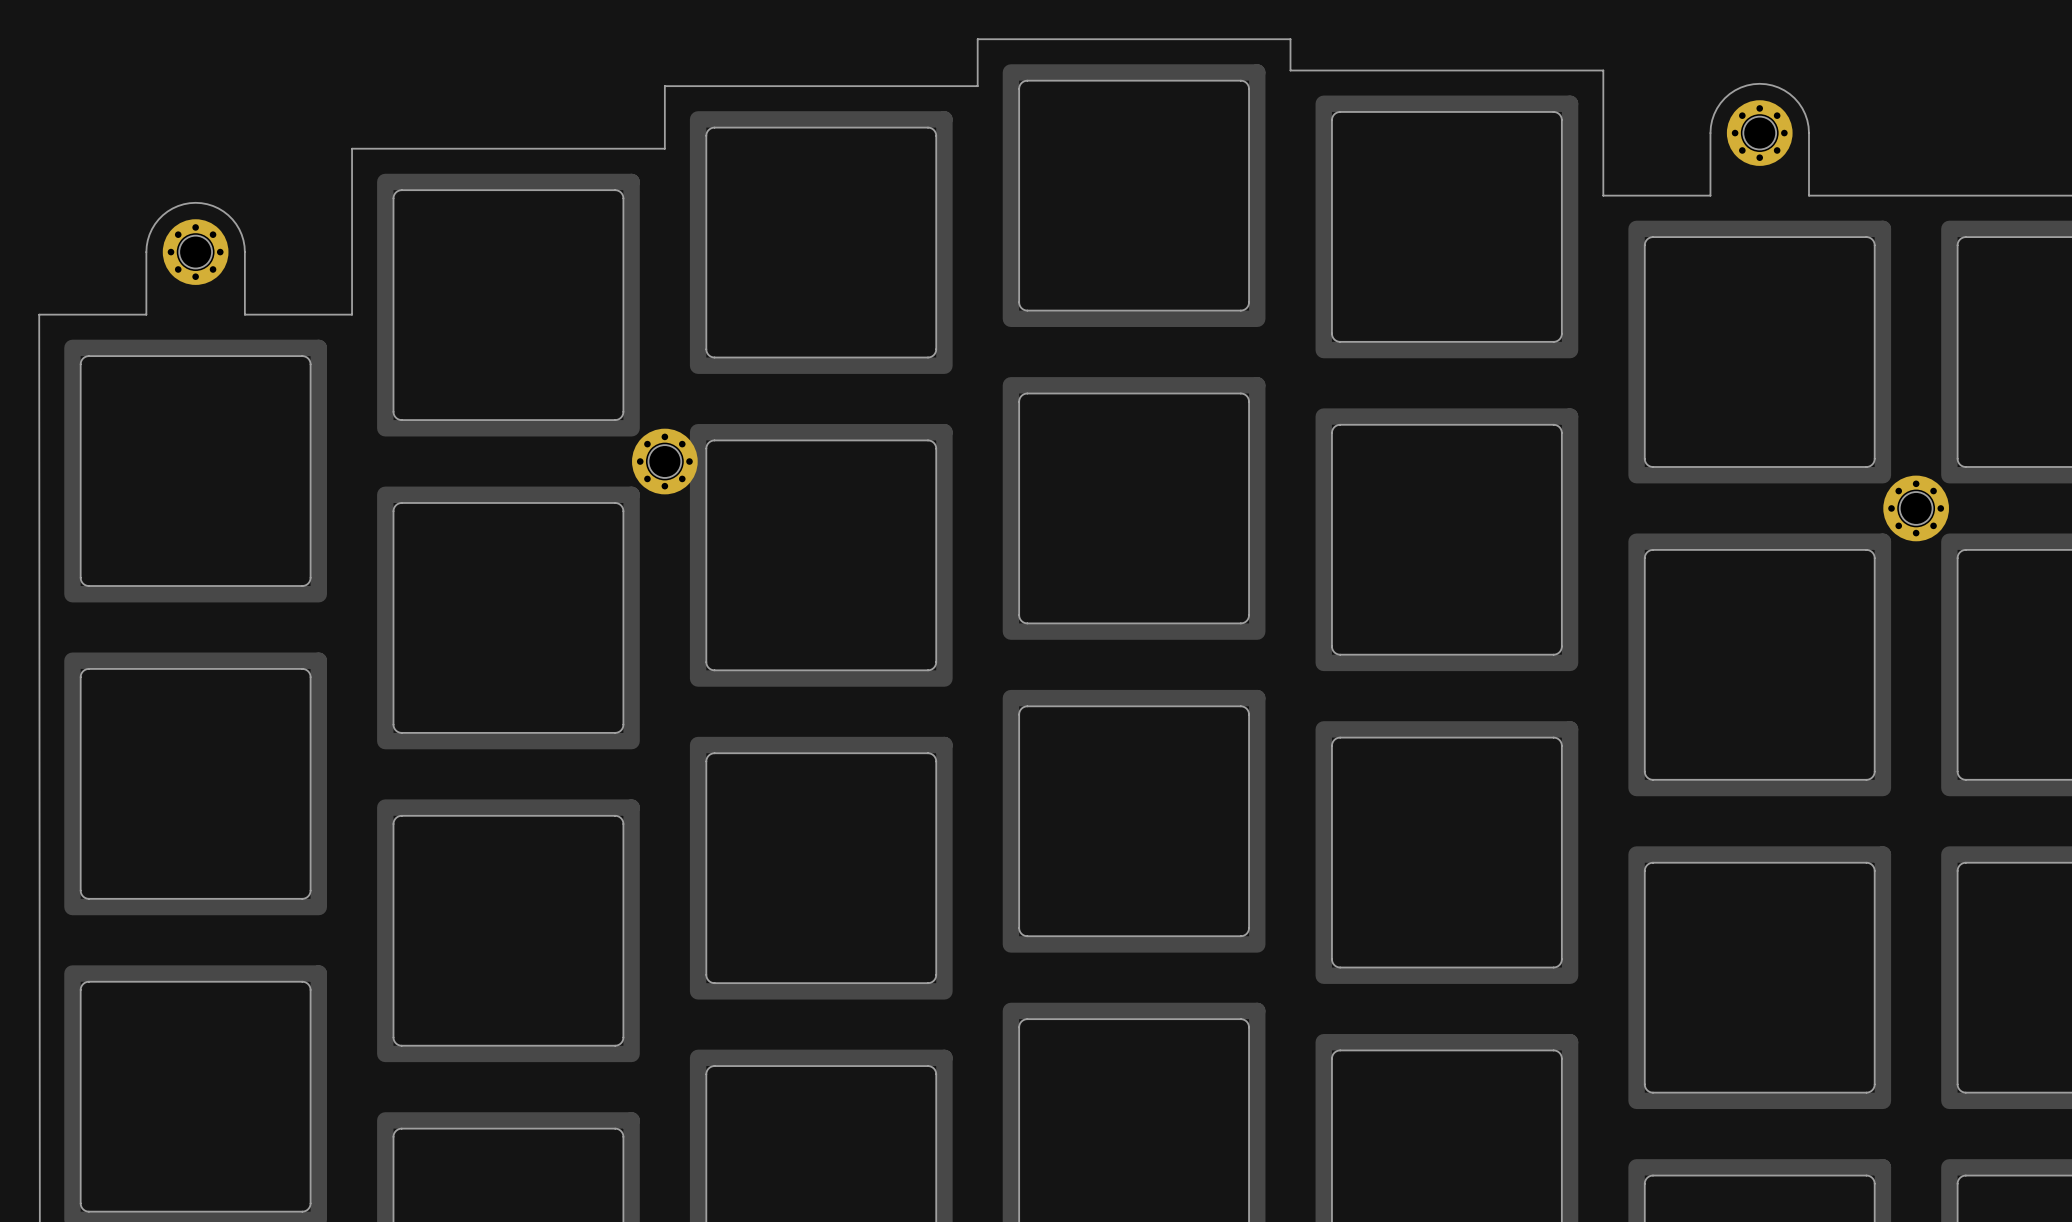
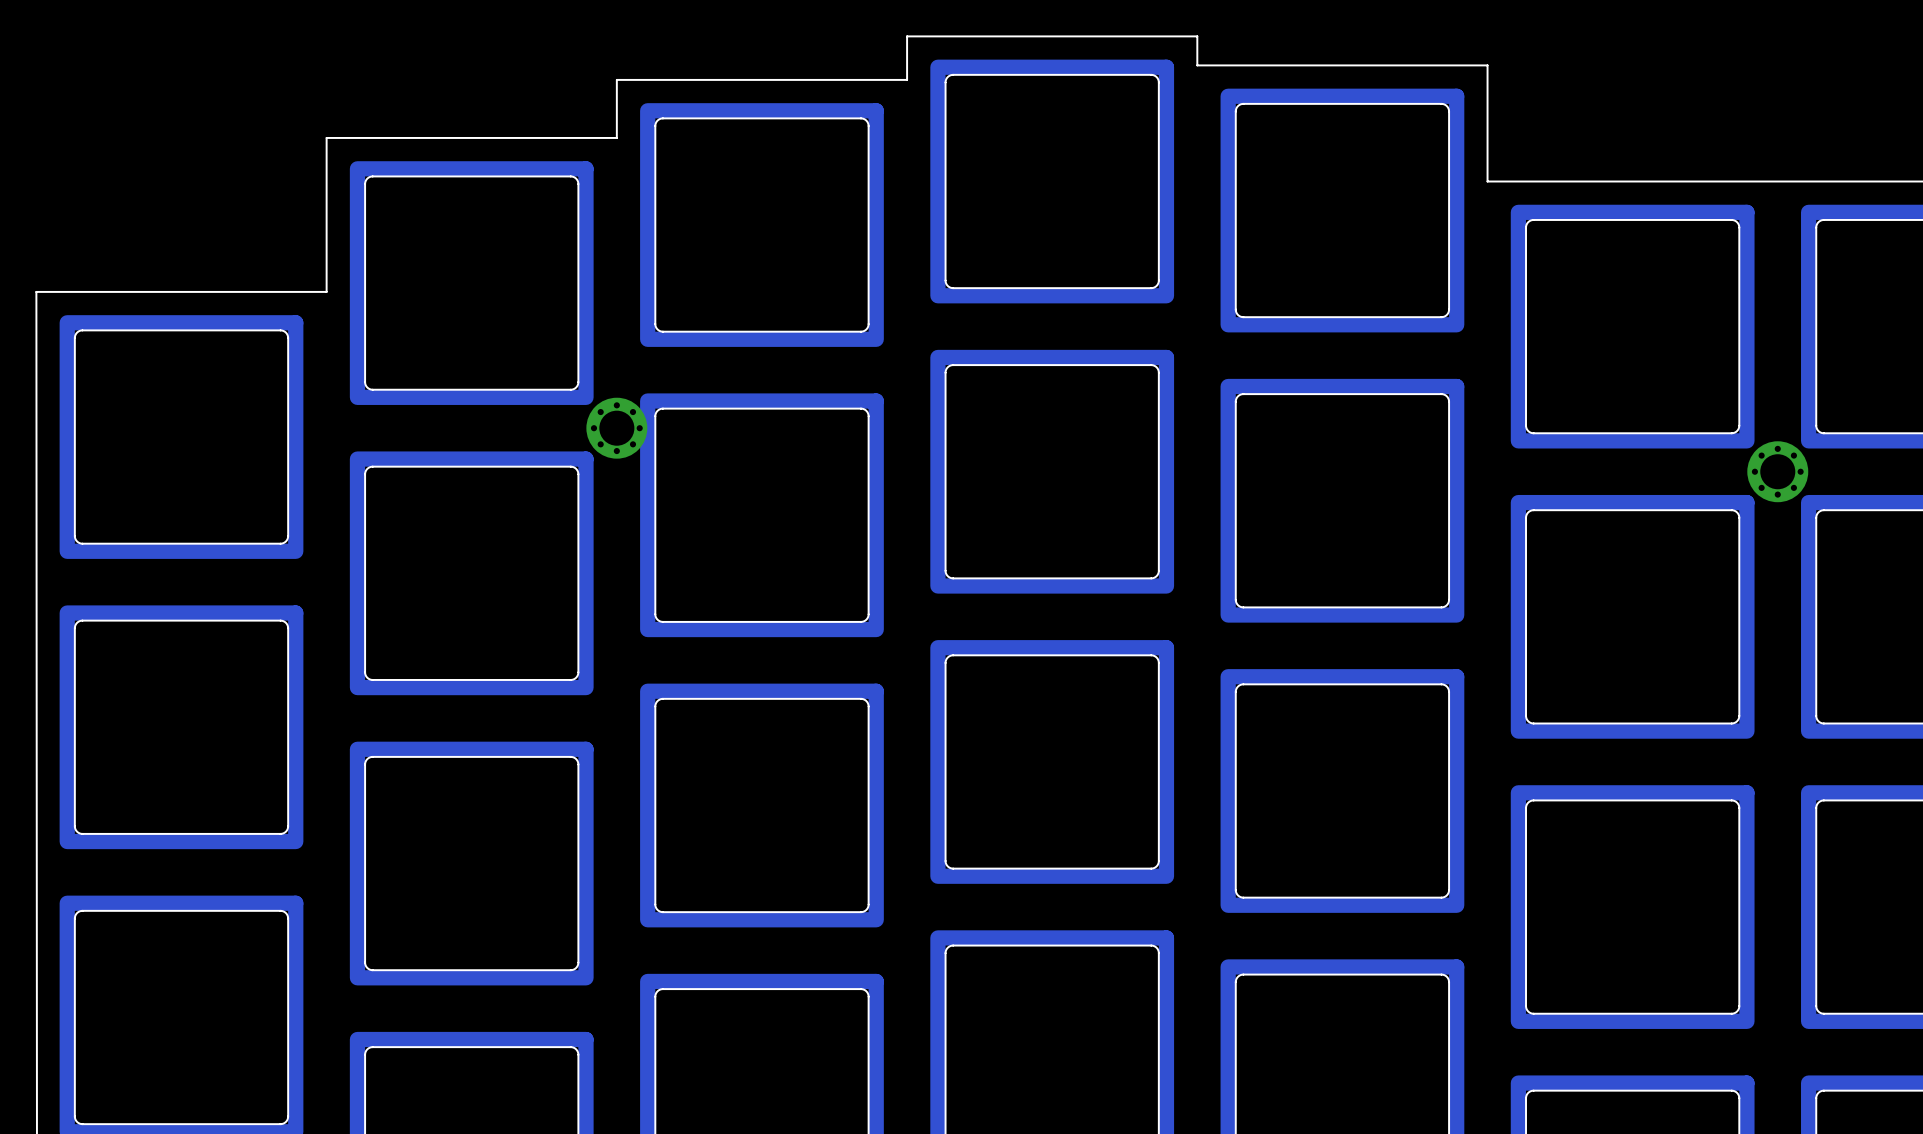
round board edge: [1742, 115, 1777, 151] -> none
part: (1759, 133) -> none
board edge: (1809, 195) (1809, 133) (1805, 114) (1798, 103) (1789, 93) (1778, 87) (1759, 83) (1746, 85) (1735, 90) (1724, 98) (1714, 114) (1710, 133) (1710, 195) -> (1678, 181) (1586, 181)
round board edge: [178, 234, 213, 270] -> none
part: (195, 252) -> none
board edge: (244, 314) (244, 252) (241, 234) (232, 219) (223, 211) (207, 204) (195, 202) (183, 204) (167, 211) (158, 219) (149, 234) (146, 252) (146, 314) -> (227, 291) (135, 291)
round board edge: [647, 444, 683, 479] -> none
round board edge: [1898, 491, 1934, 526] -> none

